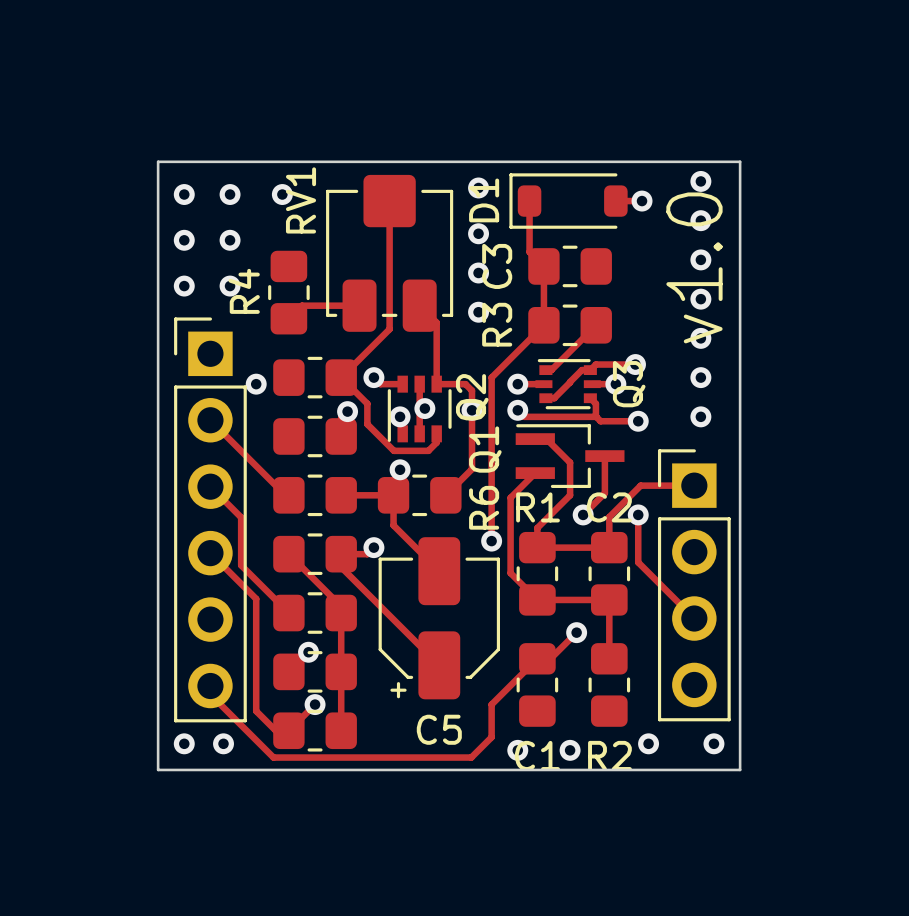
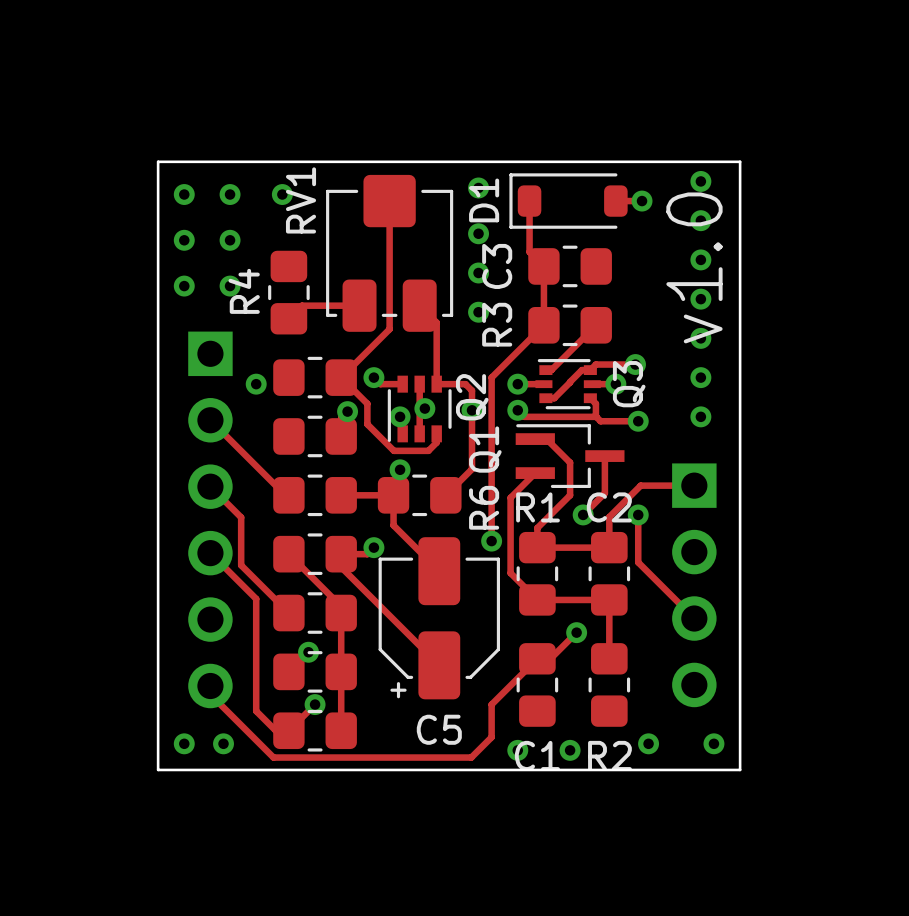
part side: top (210, 519) -> bottom (210, 519)
part side: top (694, 585) -> bottom (694, 585)

